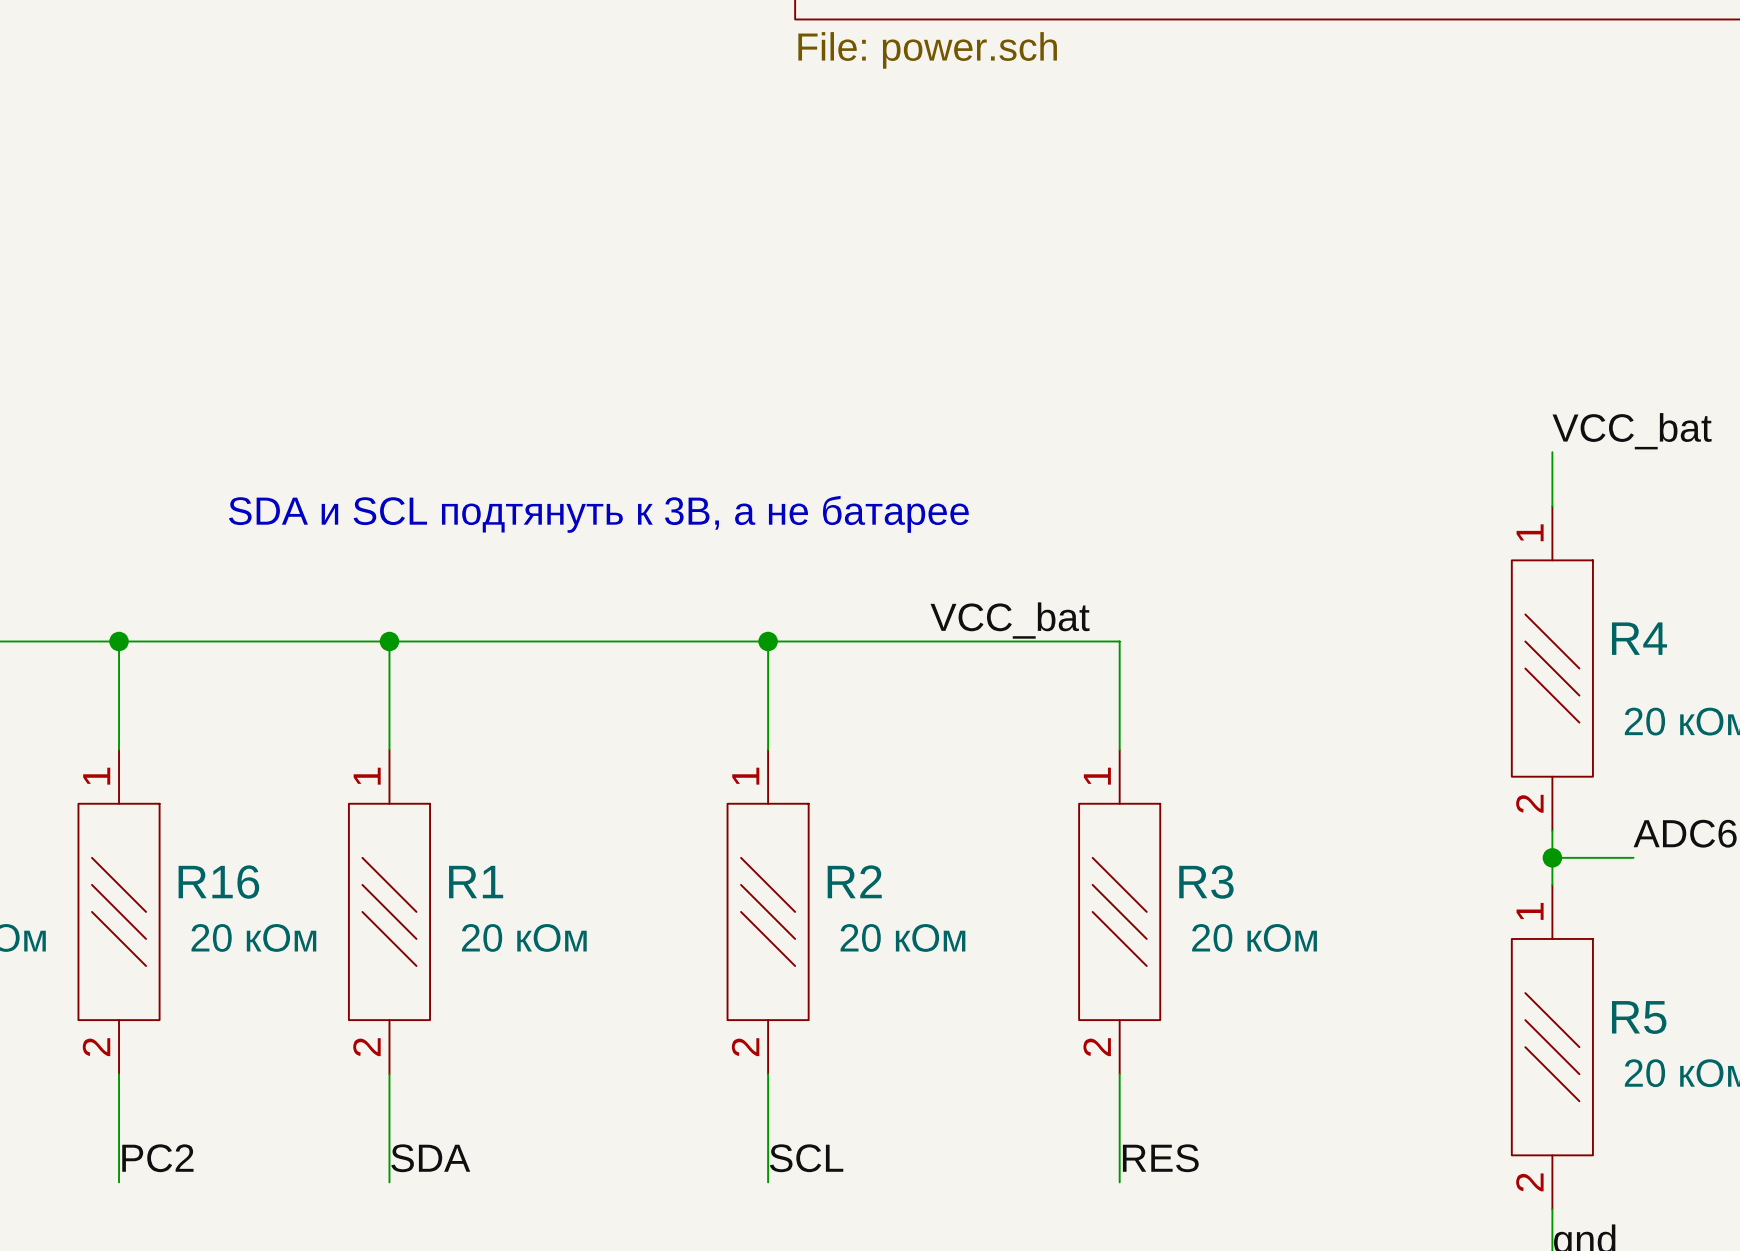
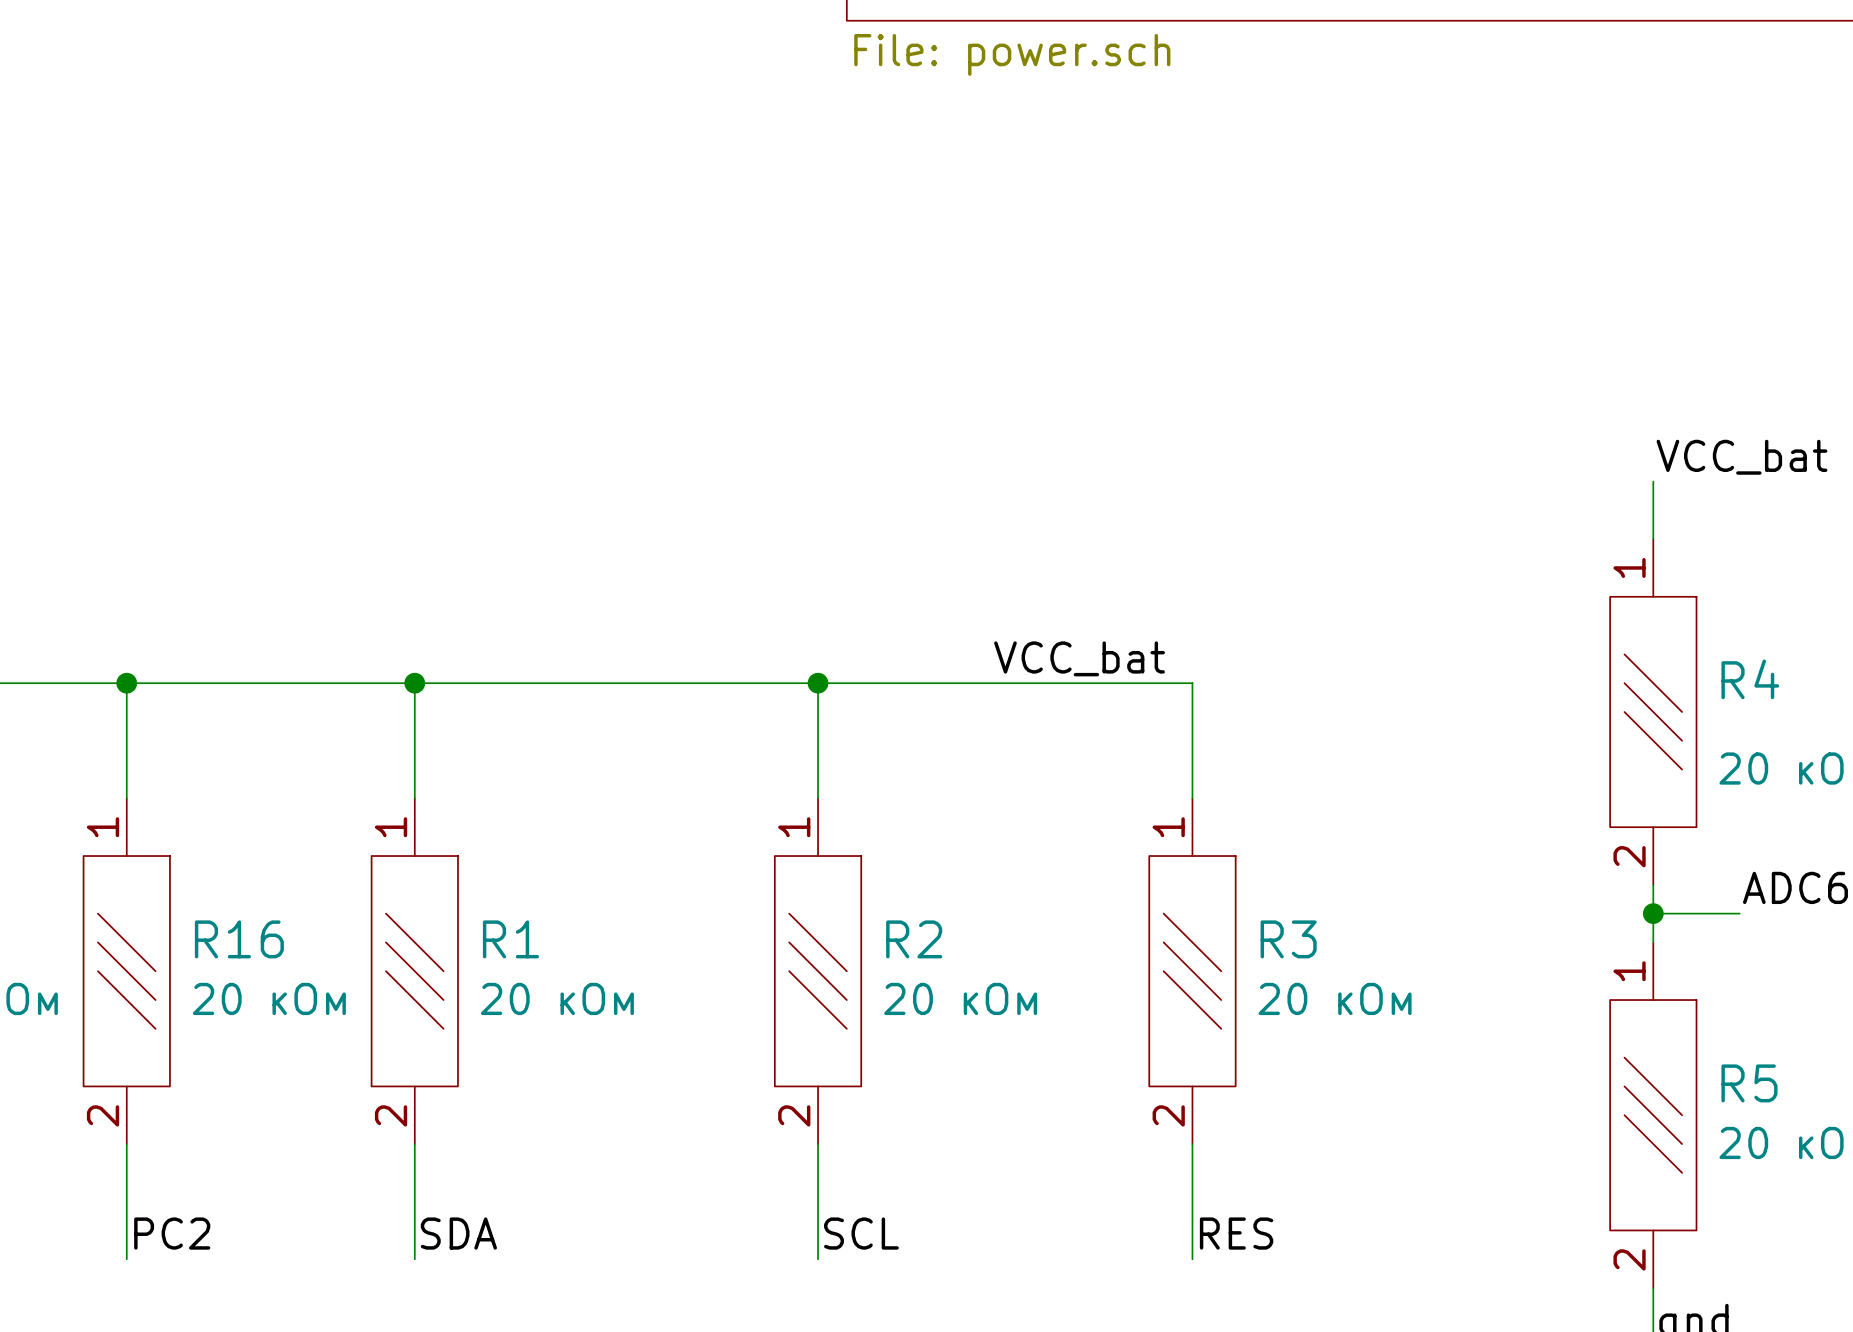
text: SDA и SCL подтянуть к 3В, а не батарее (598, 514) -> none

